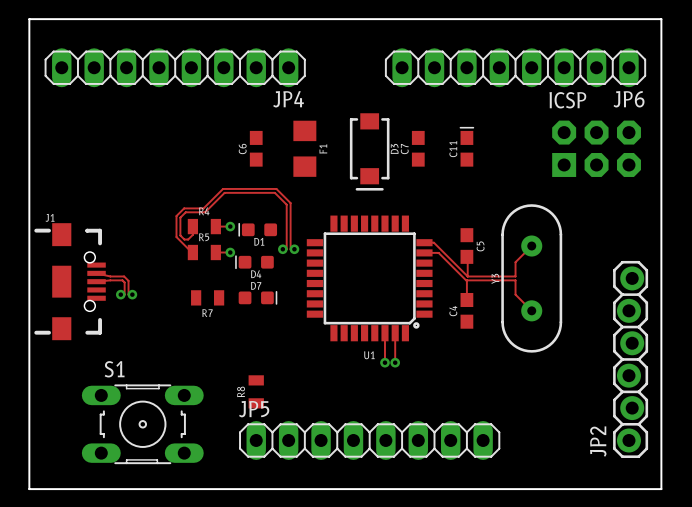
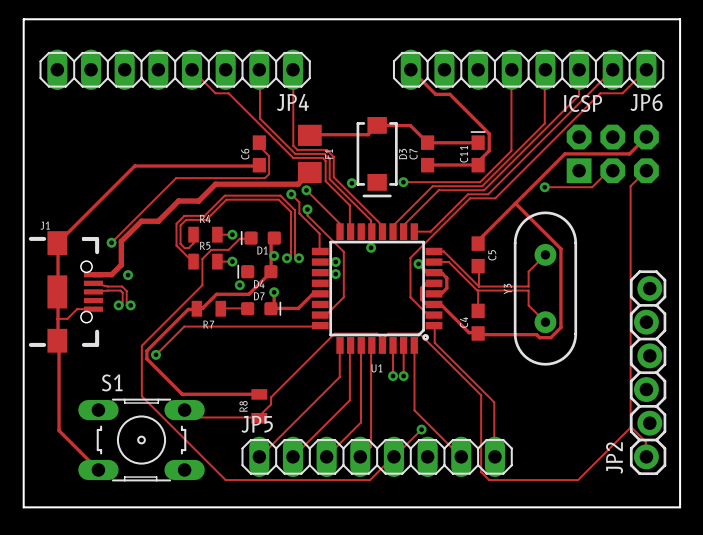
track: none -> (192, 69) (215, 93) (228, 93) (293, 157) (322, 157) (325, 160) (325, 181) (349, 205) (350, 231)
track: none -> (259, 69) (260, 118) (295, 153) (324, 153) (329, 158) (329, 179) (371, 220) (371, 231)
track: none -> (292, 69) (293, 145) (297, 149) (326, 149) (333, 156) (333, 177) (382, 225) (382, 231)
track: none -> (410, 69) (435, 94) (449, 94) (489, 133) (489, 150) (479, 160) (478, 165)
track: none -> (511, 69) (511, 150) (480, 182) (403, 182)
track: none -> (545, 69) (544, 123) (482, 186) (432, 186) (393, 225) (393, 231)
track: none -> (579, 69) (579, 95) (484, 190) (438, 190) (404, 224) (403, 231)
track: none -> (612, 69) (488, 194) (468, 194) (430, 231) (414, 231)
track: none -> (646, 69) (622, 93) (600, 93) (495, 198) (470, 198) (410, 257) (410, 297) (427, 314) (434, 315)
track: none -> (377, 125) (368, 134) (309, 135)
track: none -> (377, 125) (410, 125) (427, 142)
track: none -> (646, 137) (629, 153) (564, 153) (478, 240) (478, 243)
track: none -> (259, 142) (260, 146) (269, 155) (269, 174) (265, 178) (176, 178) (111, 242)
track: none -> (427, 142) (478, 142)
track: none -> (259, 165) (134, 166) (57, 243) (59, 430) (98, 469)
track: none -> (427, 165) (478, 165)
track: none -> (612, 170) (608, 171) (592, 187) (544, 187)
track: none -> (646, 170) (630, 186) (630, 426) (645, 441) (646, 456)
track: none -> (309, 172) (298, 184) (215, 184) (198, 201) (178, 201) (158, 221) (141, 221) (121, 241) (121, 264) (111, 274) (93, 274)
via: none -> (351, 183)
via: none -> (403, 182)
via: none -> (544, 187)
track: none -> (306, 190) (339, 223) (339, 231)
via: none -> (306, 190)
track: none -> (291, 194) (299, 202) (299, 213) (319, 233) (320, 251)
via: none -> (291, 194)
track: none -> (515, 203) (560, 248) (560, 327) (550, 337) (539, 337) (536, 334) (479, 334) (478, 332) (469, 332) (441, 305) (425, 303) (421, 299) (421, 288) (425, 284) (434, 283)
track: none -> (307, 209) (307, 215) (343, 251) (343, 297) (326, 314) (320, 315)
via: none -> (307, 209)
track: none -> (251, 238) (239, 238) (228, 249) (211, 249) (202, 258) (202, 285) (141, 345) (141, 396) (225, 480) (370, 480) (421, 429)
track: none -> (274, 238) (271, 241) (270, 271) (248, 294) (216, 294) (202, 308) (188, 309) (146, 350) (146, 358) (182, 394) (259, 394)
via: none -> (111, 242)
via: none -> (371, 247)
via: none -> (274, 255)
via: none -> (335, 261)
track: none -> (418, 263) (426, 272) (441, 273) (446, 278) (446, 288) (441, 293) (434, 293)
via: none -> (418, 263)
via: none -> (335, 274)
via: none -> (128, 275)
via: none -> (239, 285)
track: none -> (274, 292) (274, 307) (270, 308) (298, 308) (312, 294) (320, 293)
via: none -> (274, 292)
track: none -> (220, 308) (247, 308)
track: none -> (93, 309) (77, 309) (67, 318) (58, 318)
track: none -> (320, 325) (184, 326) (155, 354)
track: none -> (434, 325) (434, 342) (494, 402) (494, 456)
track: none -> (340, 345) (339, 377) (259, 456)
track: none -> (350, 345) (349, 400) (292, 456)
track: none -> (361, 345) (360, 422) (326, 456)
track: none -> (371, 345) (371, 446) (360, 456)
track: none -> (414, 345) (414, 410) (461, 456)
via: none -> (155, 354)
track: none -> (184, 410) (192, 417) (259, 418) (271, 404) (271, 397) (334, 333) (377, 333) (382, 338) (382, 345) (382, 337) (388, 333) (419, 333) (481, 395) (481, 472) (489, 480) (578, 480) (631, 427)
via: none -> (421, 429)

